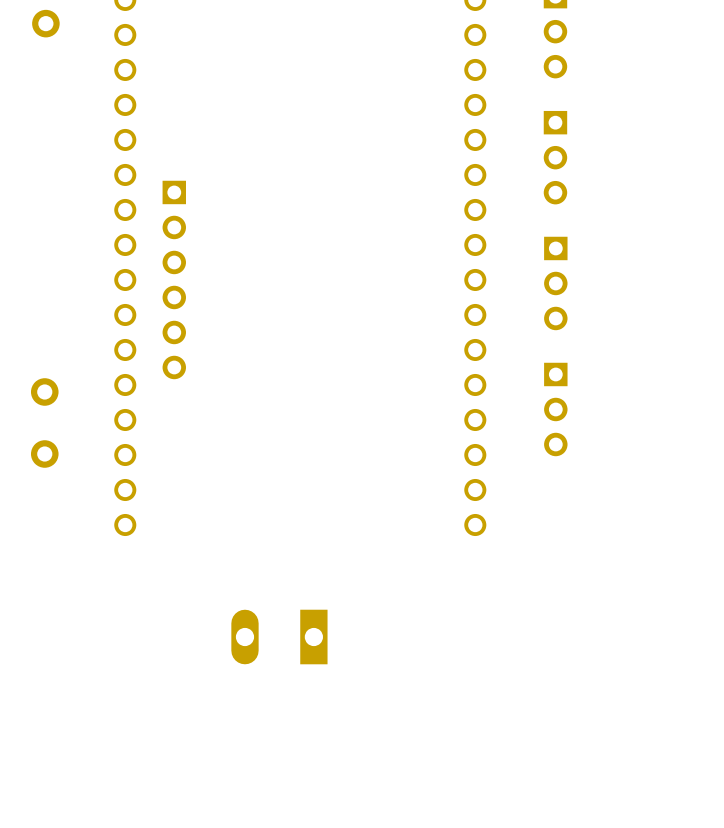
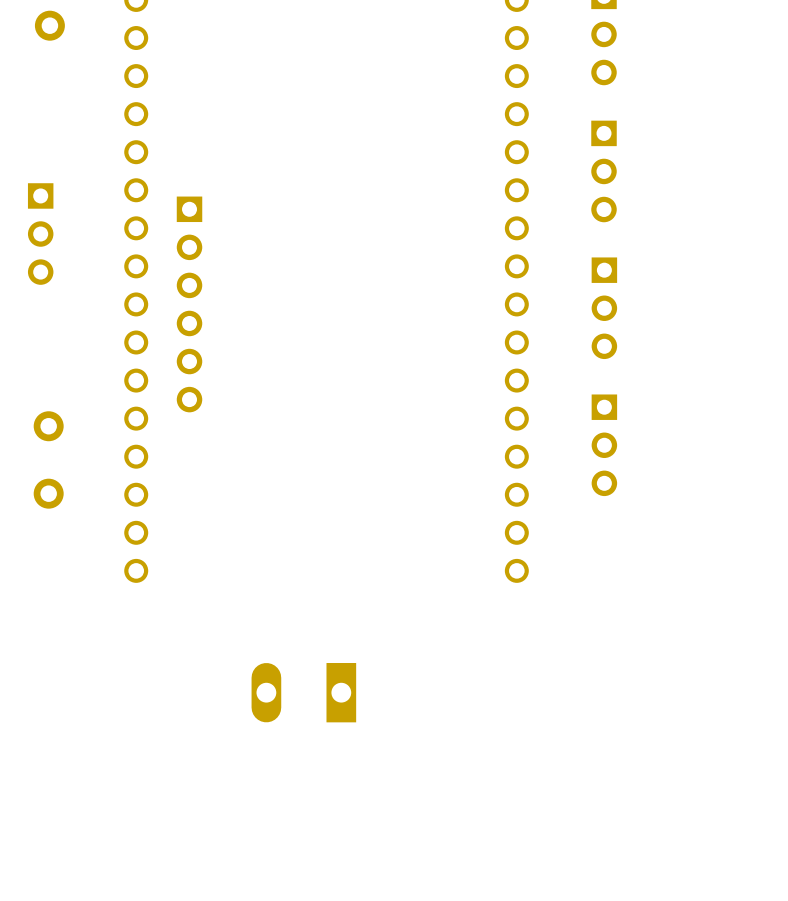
part: none -> (40, 234)

